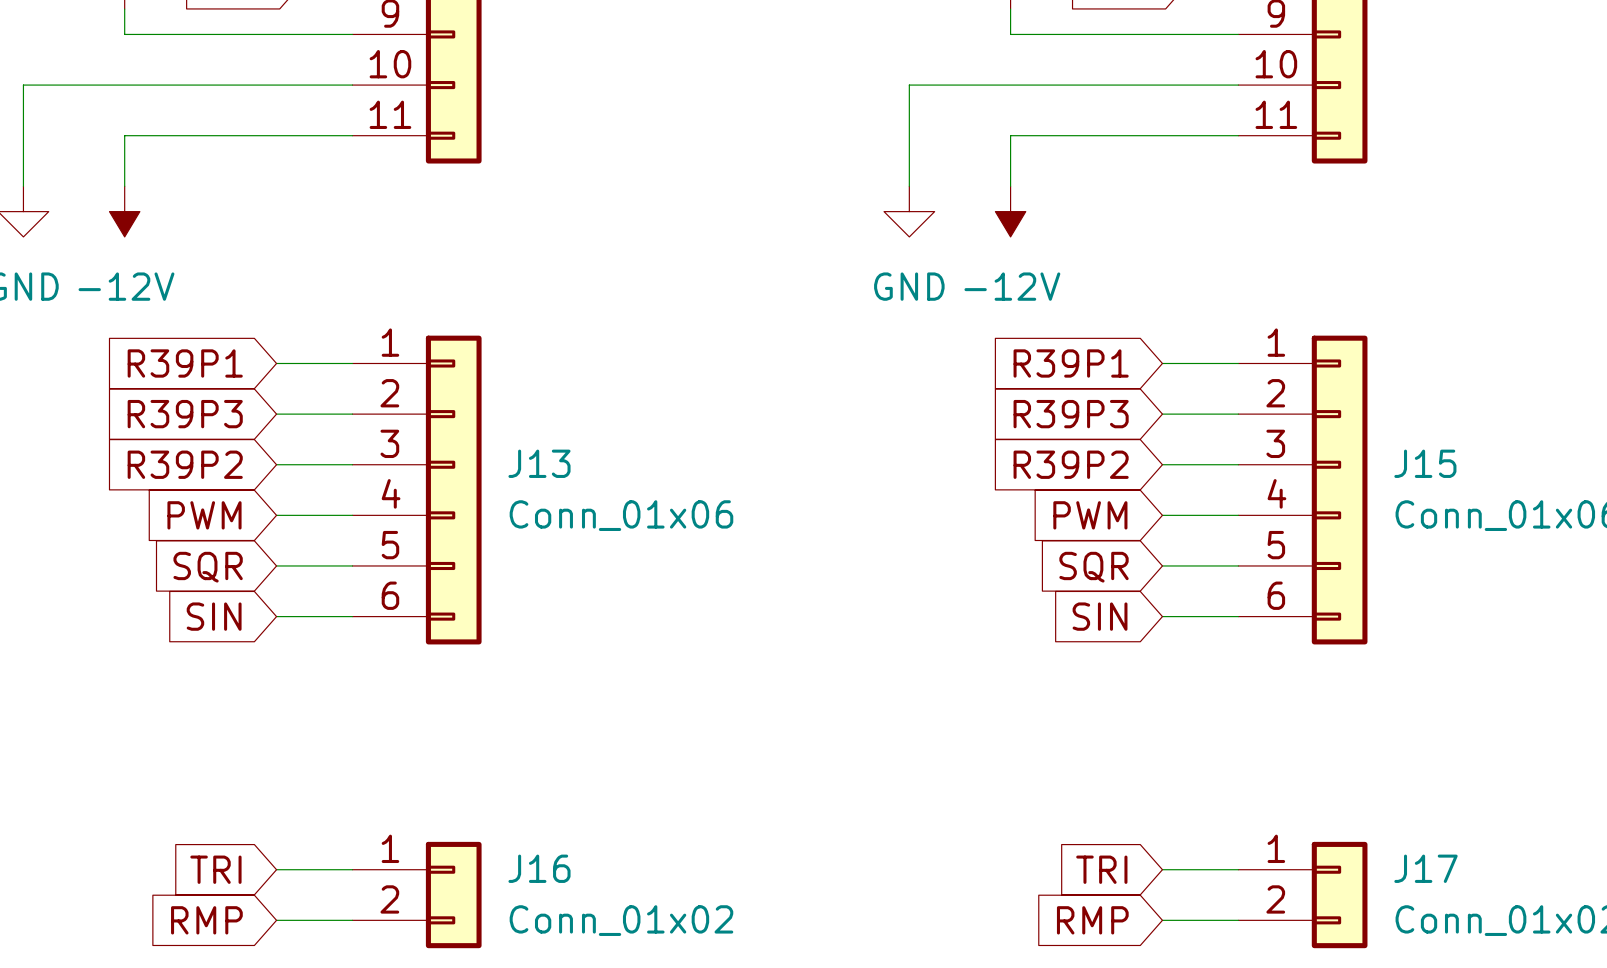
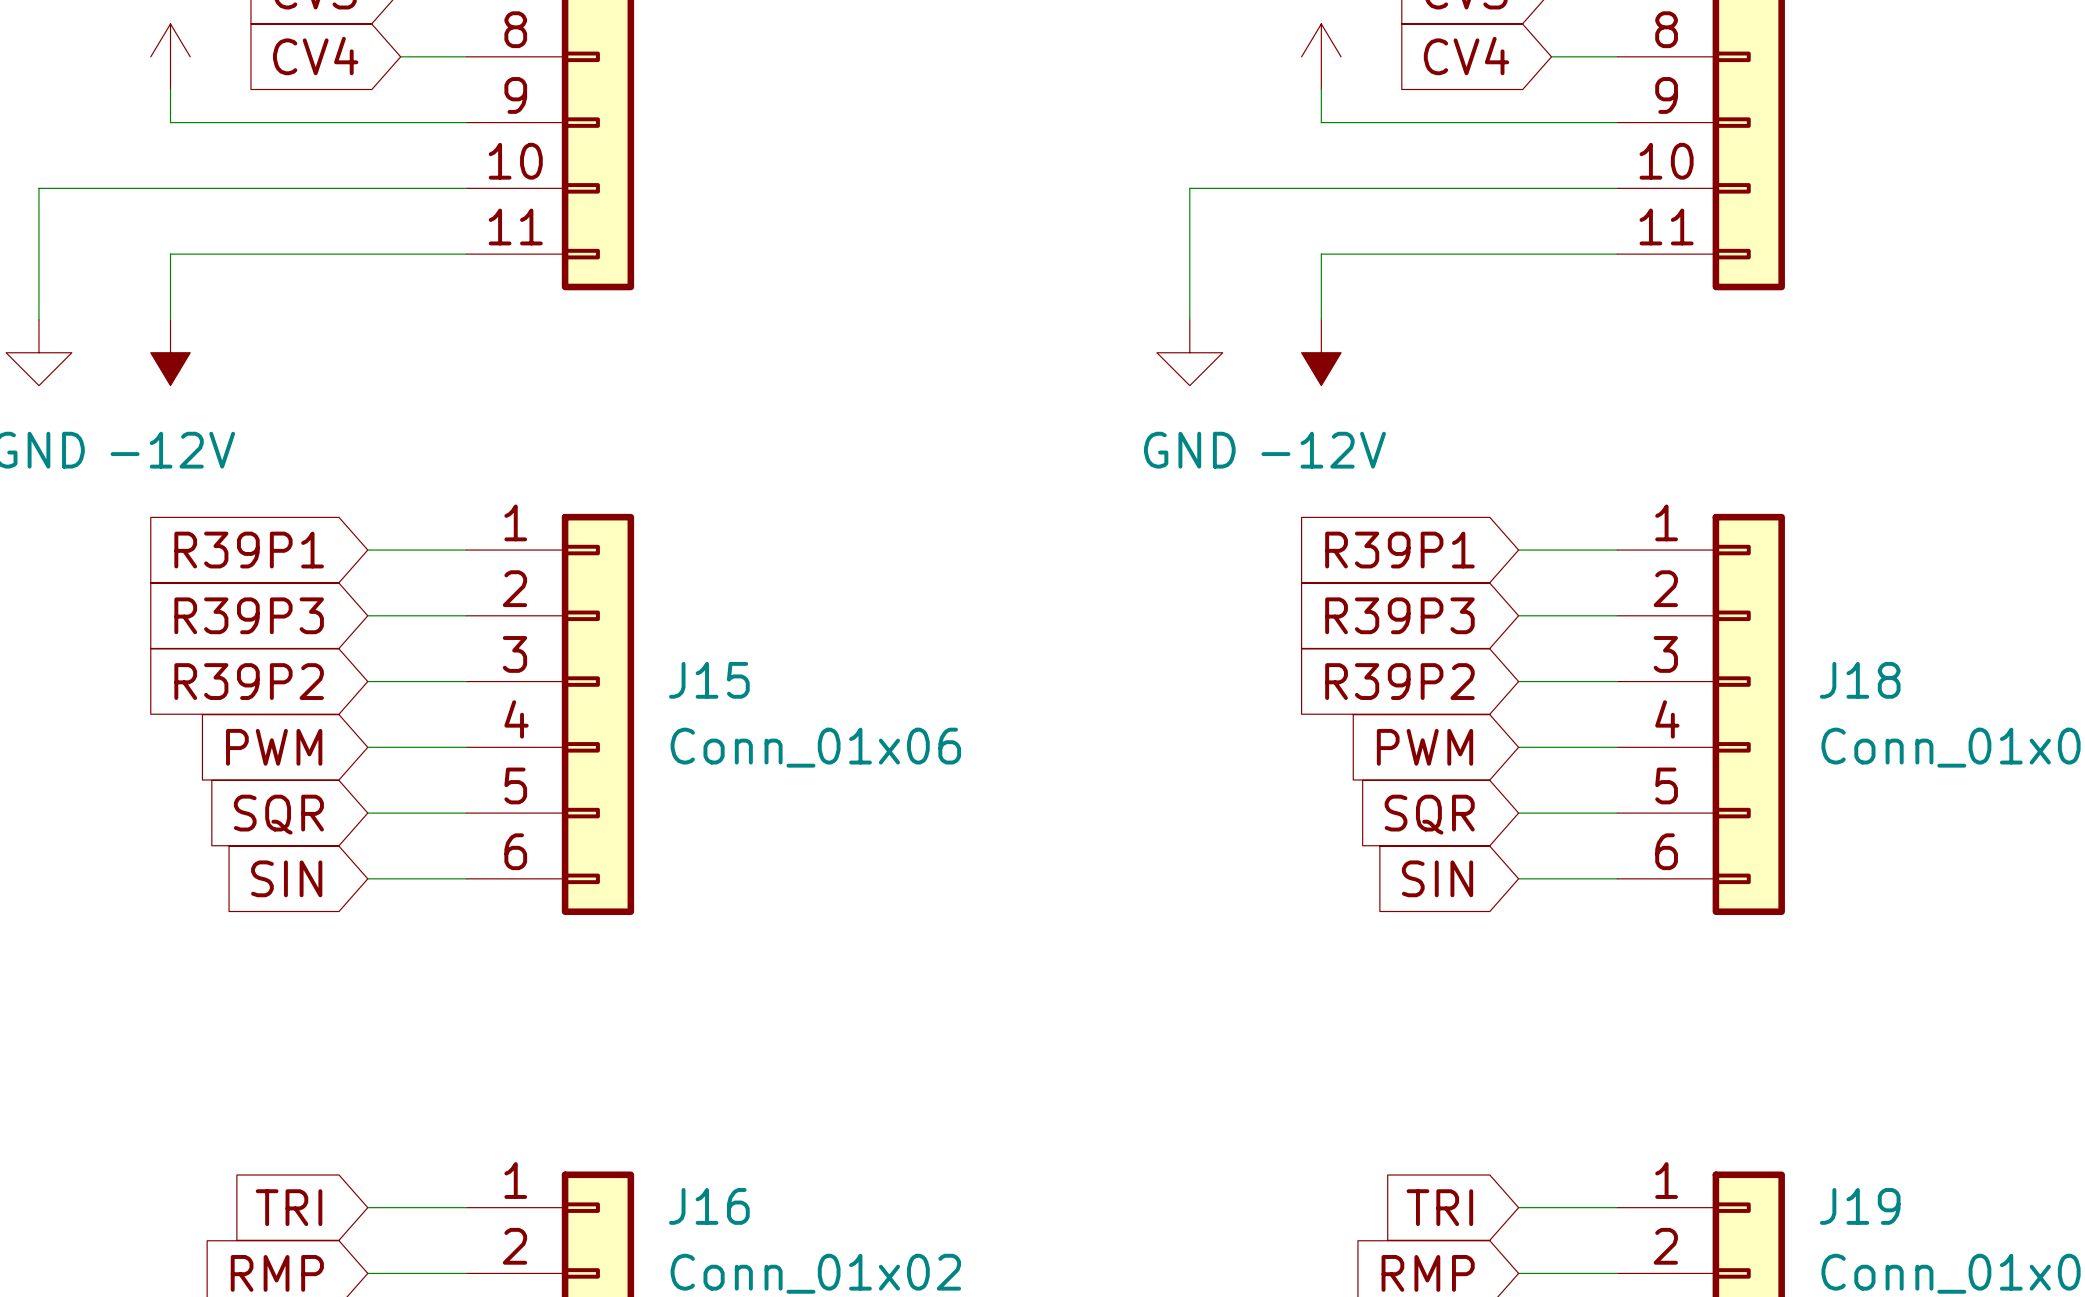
J13 name: J13 (539, 463) -> J15 (709, 680)
J15 name: J15 (1425, 463) -> J18 (1860, 680)
J17 name: J17 (1426, 868) -> J19 (1860, 1206)

